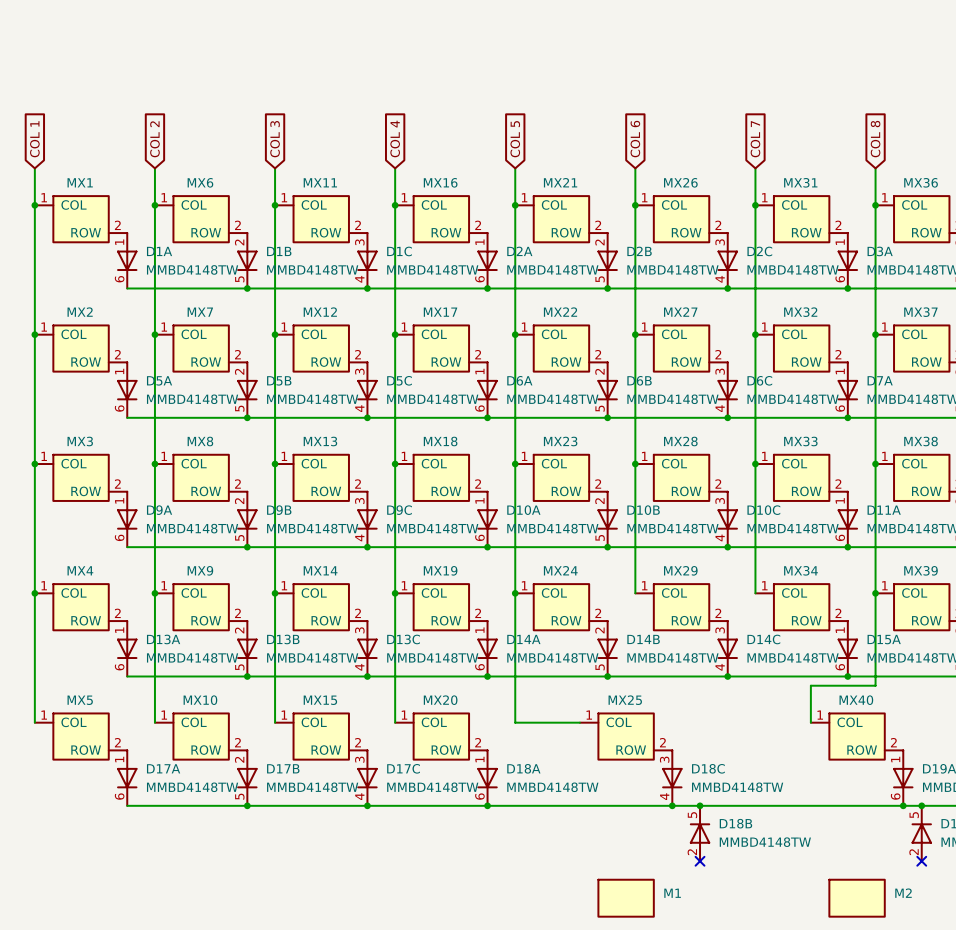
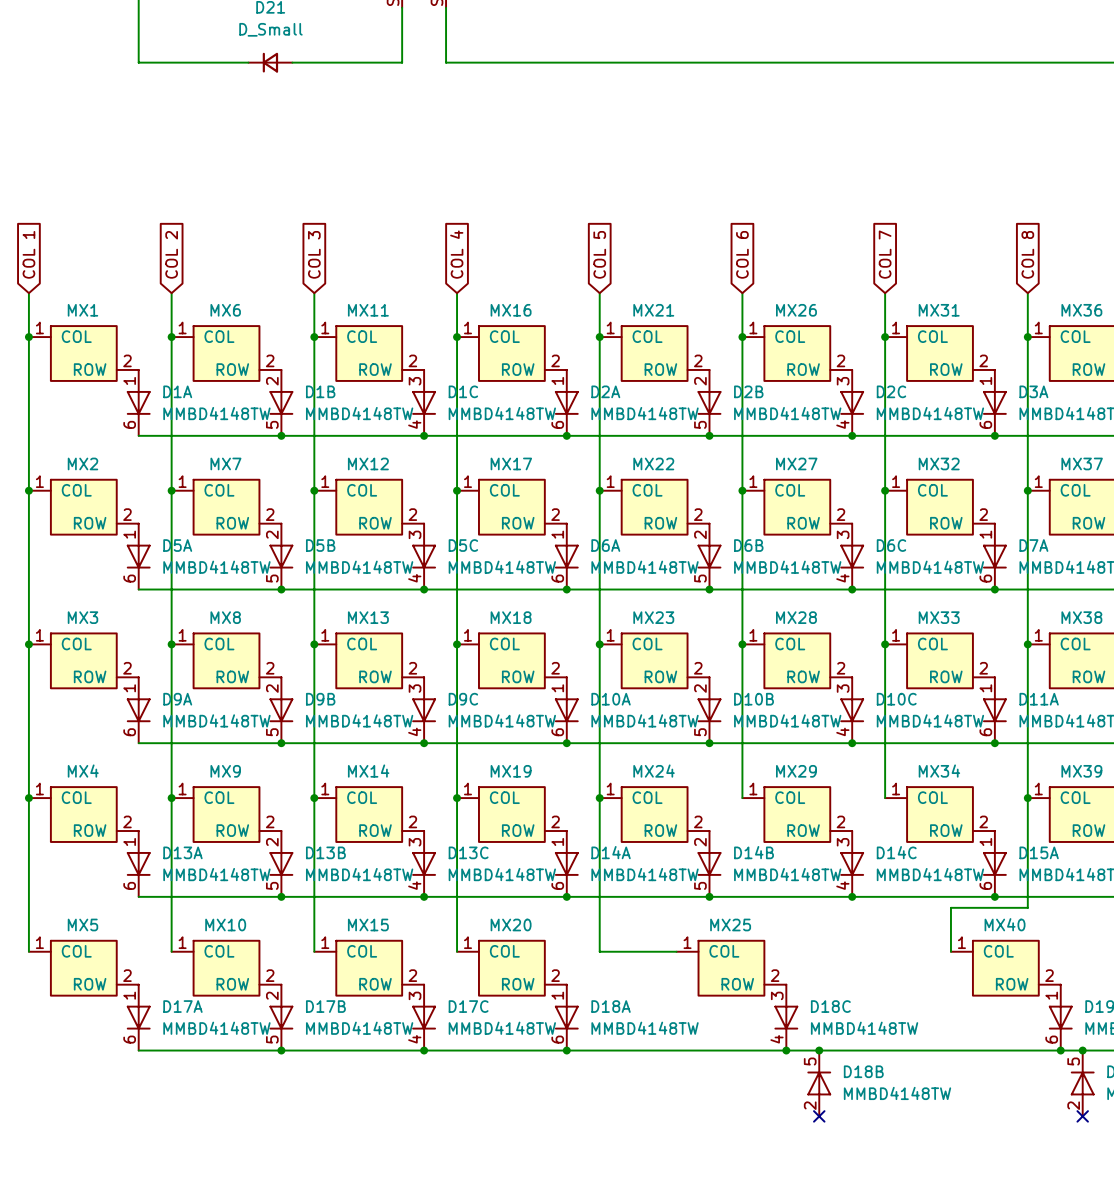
M1: (626, 898) -> none
M2: (857, 898) -> none

